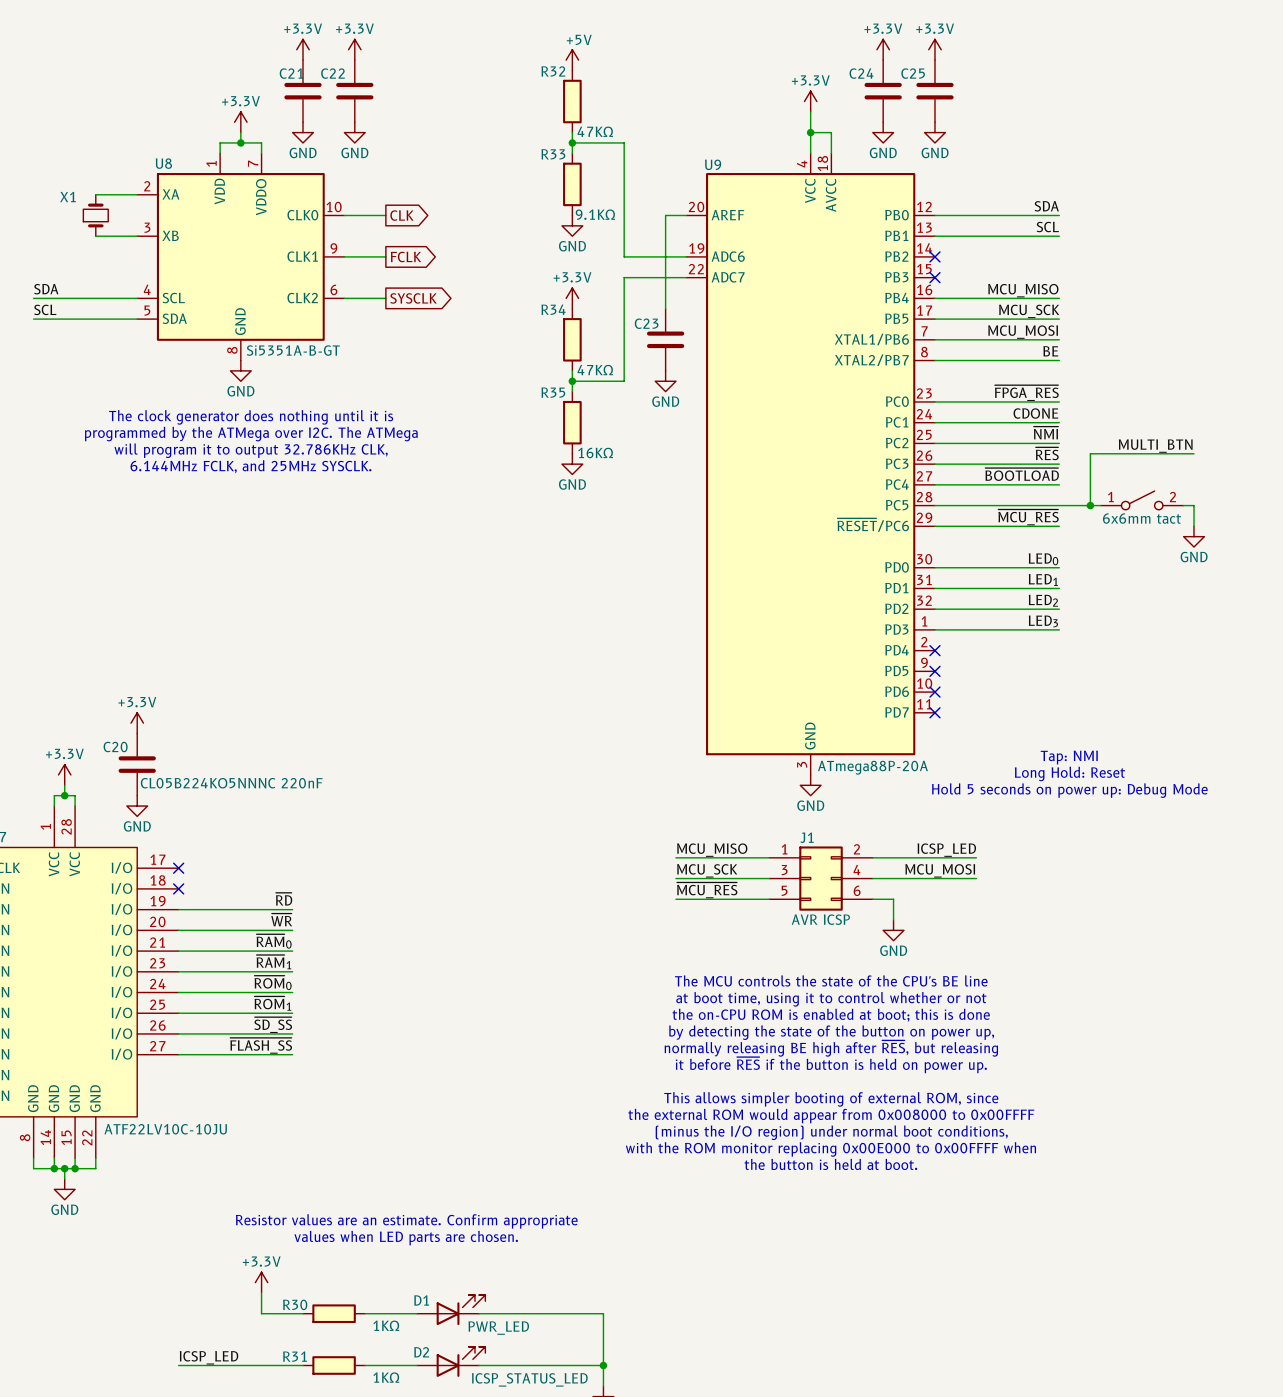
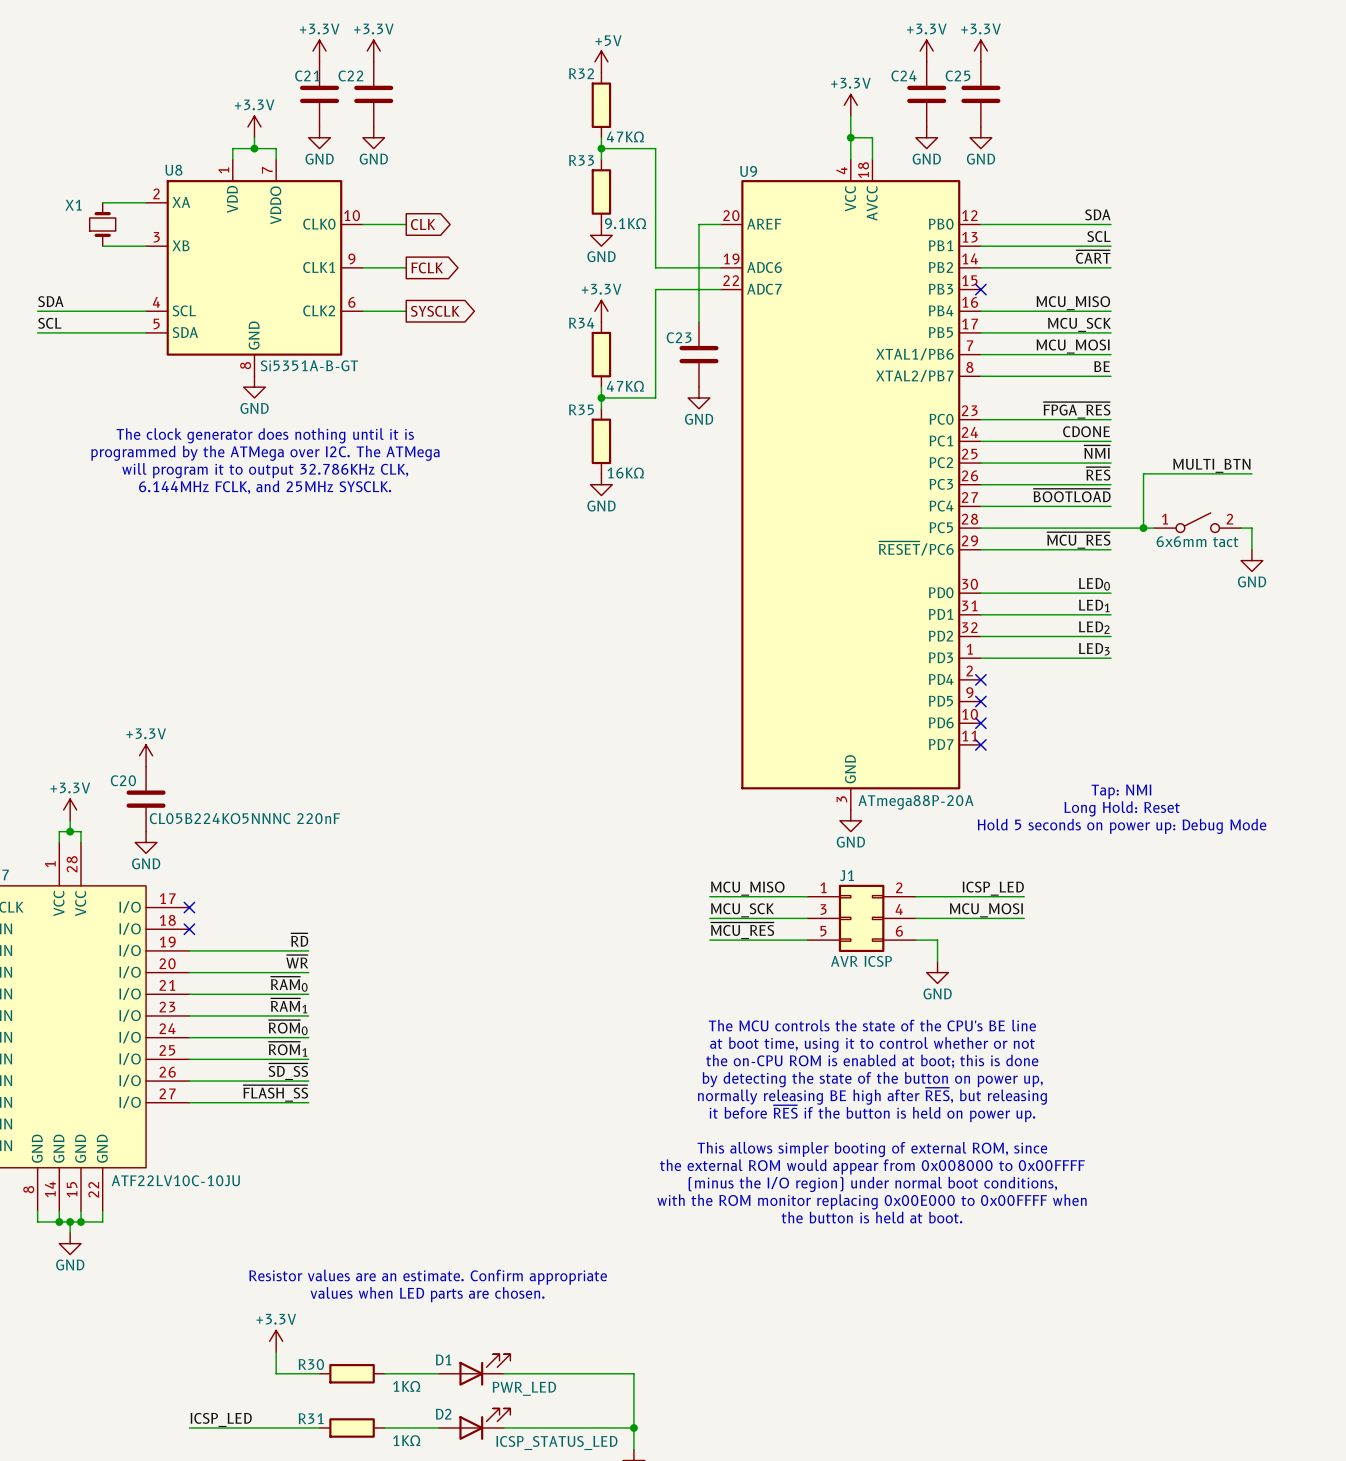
label: none -> ~{CART} (1093, 257)
wire: none -> (980, 267) (1111, 267)
no-connect mark: (934, 256) -> none

